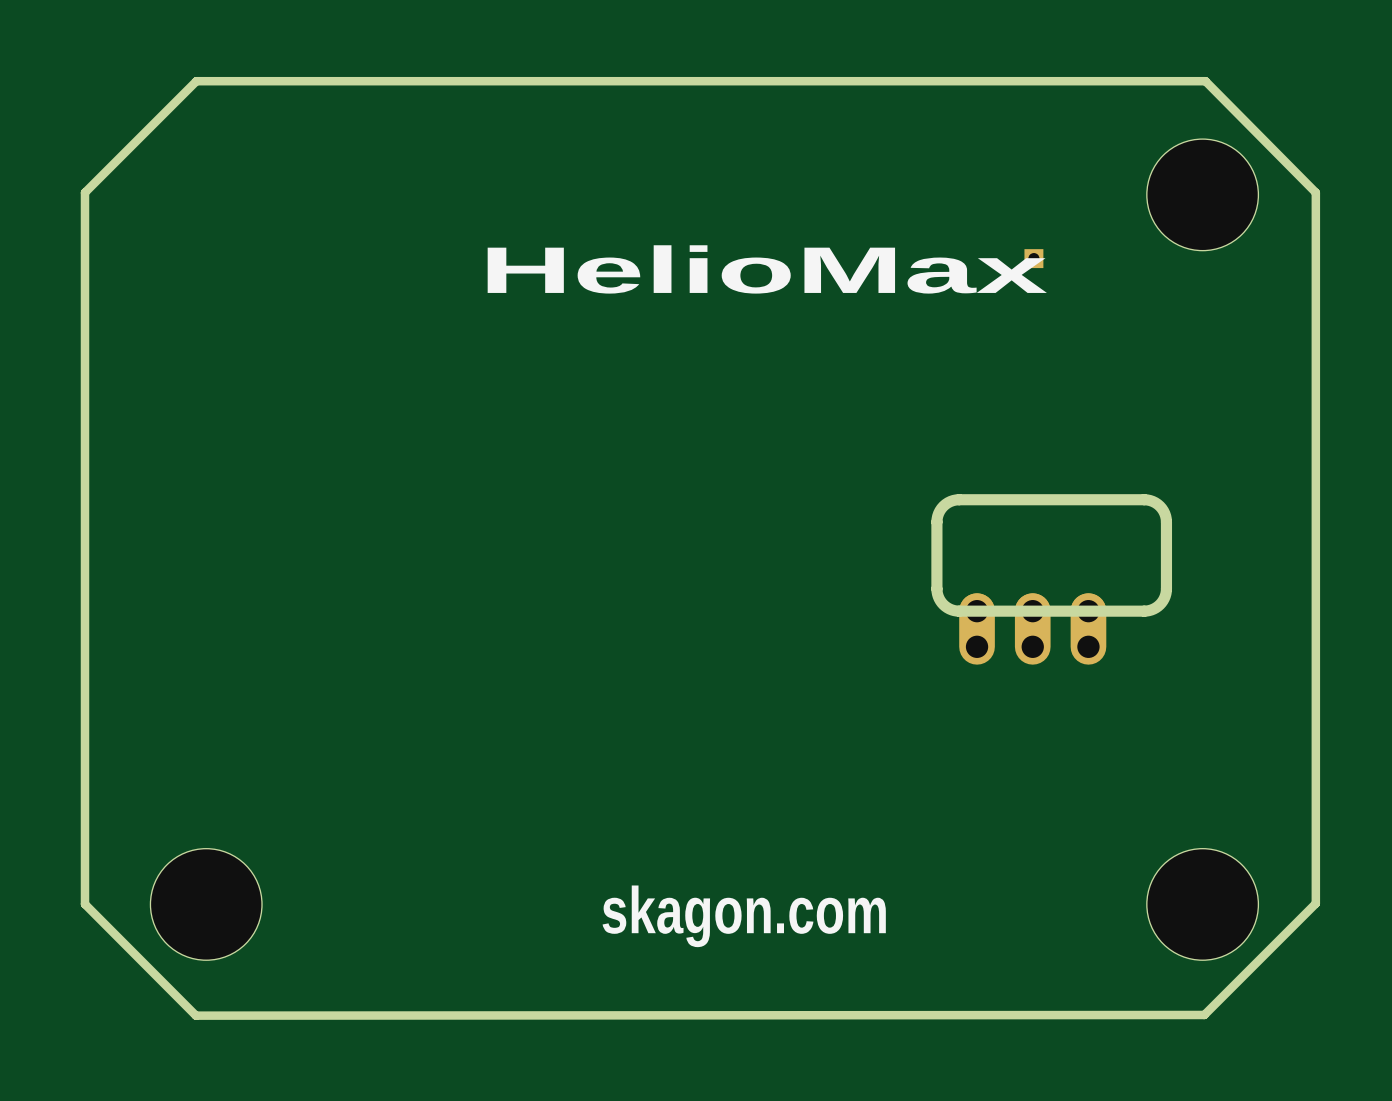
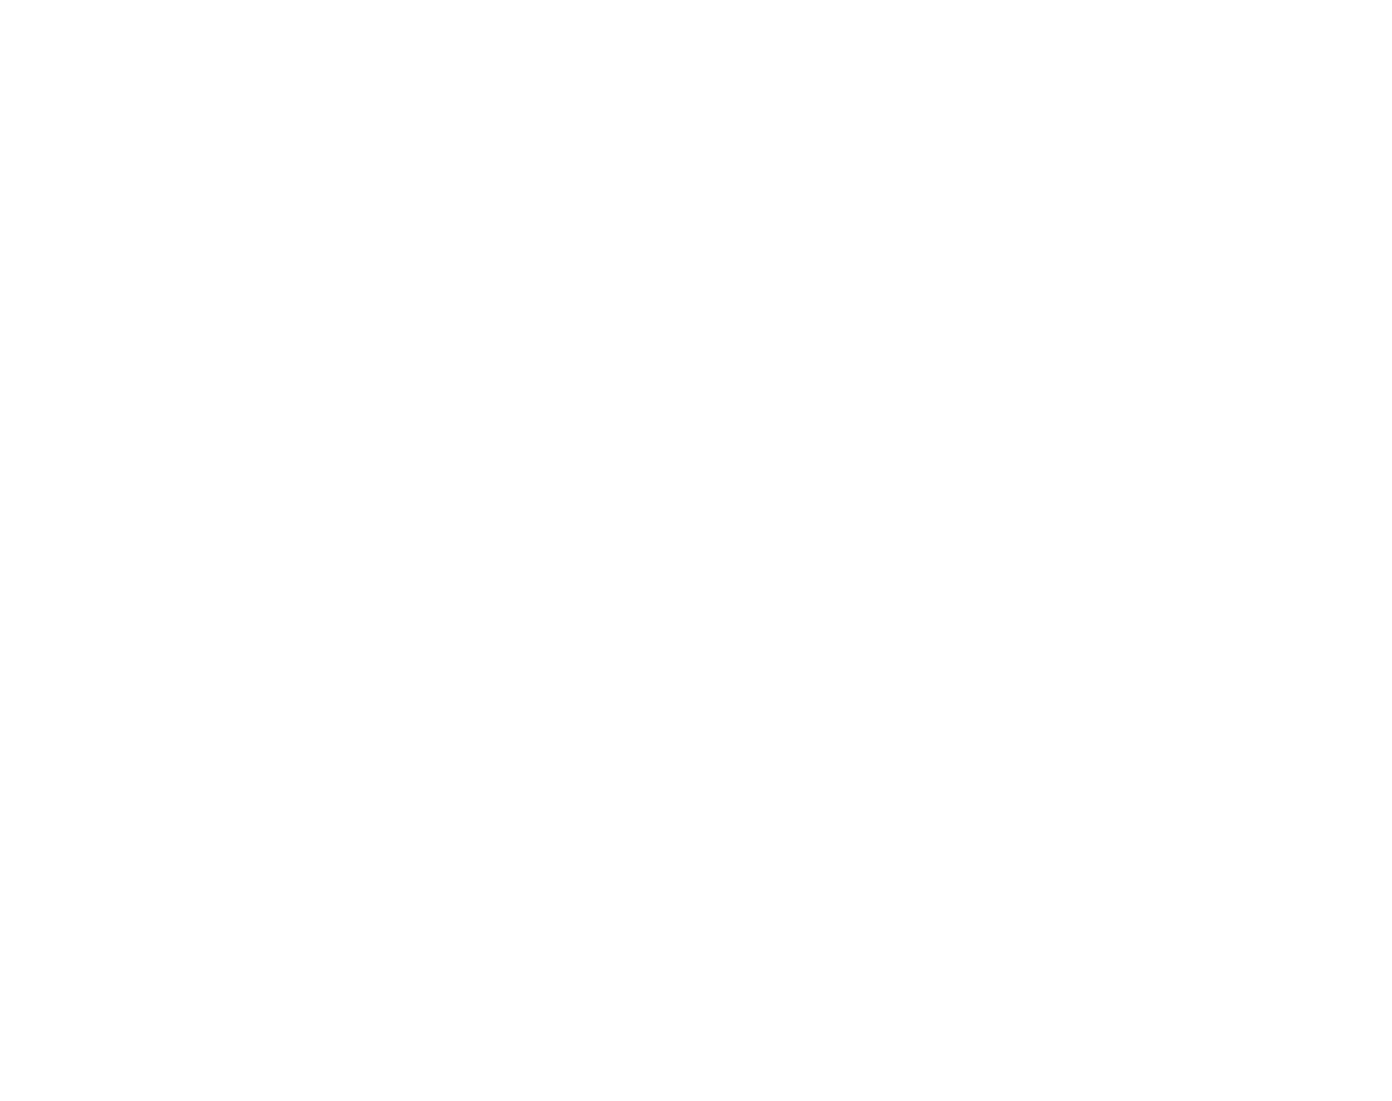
board edge: (1205, 81) (1315, 192) (1315, 903) (1204, 1014) (195, 1015) (84, 904) (84, 192) (196, 81) (1205, 81) -> none
part: (1202, 194) -> none
part: (1033, 258) -> none
text: HelioMax (767, 269) -> none
part: (1051, 579) -> none
part: (206, 904) -> none
part: (1202, 904) -> none
text: skagon.com (744, 916) -> none

